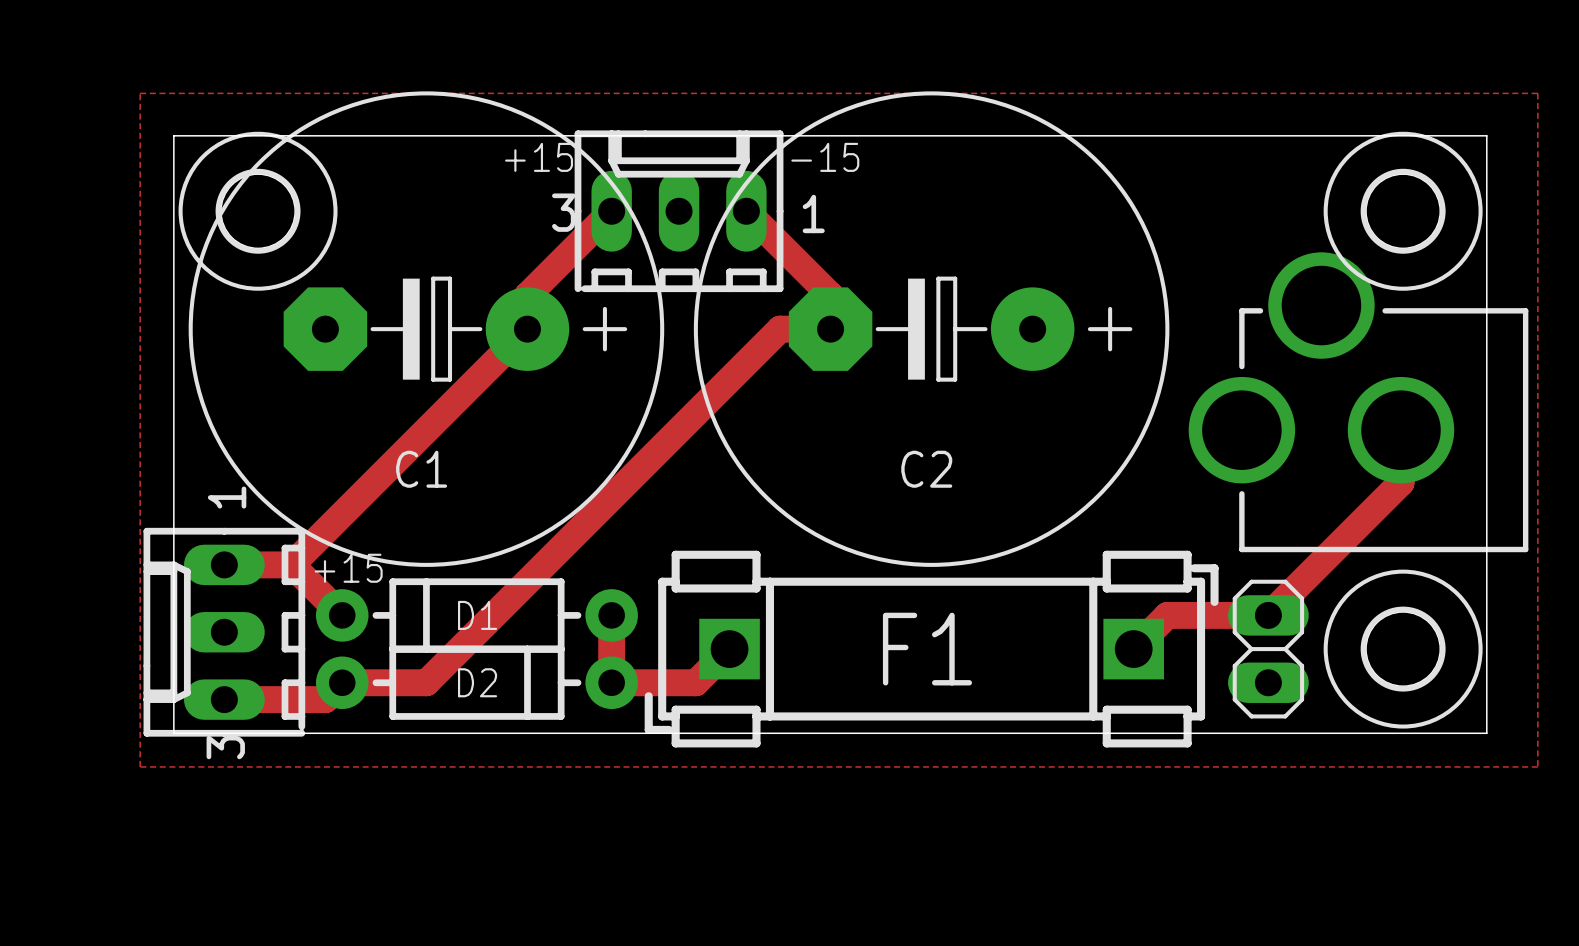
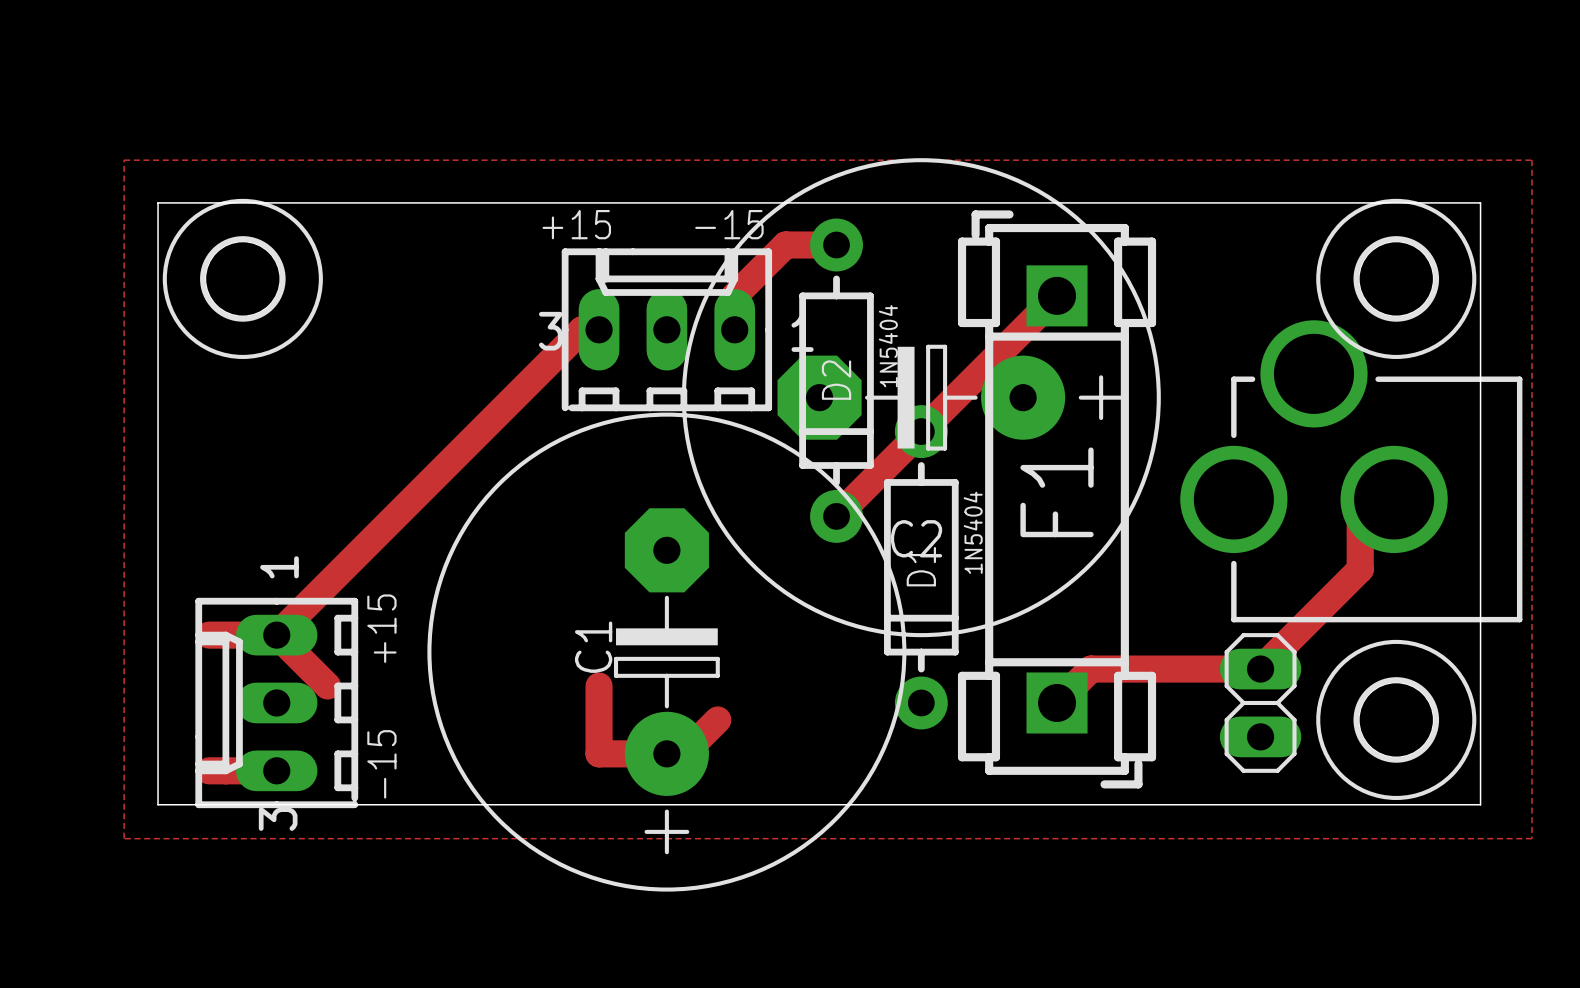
text position: +15 (539, 157) -> +15 (576, 224)
text position: -15 (825, 157) -> -15 (729, 224)
track: none -> (836, 244) (785, 244) (734, 295) (734, 329)
track: (611, 211) (527, 295) (527, 329) -> (599, 329) (582, 329) (514, 397)
part position: (679, 211) -> (666, 329)
track: (746, 211) (830, 295) (830, 329) (780, 329) (426, 682) (342, 682) (325, 699) (291, 699) -> none
track: none -> (1057, 295) (836, 516)
D2 value: none -> 1N5404 (888, 346)
C1 rotation: 0° (426, 329) -> 90° clockwise (666, 652)
C1 position: (426, 329) -> (666, 652)
track: none -> (1360, 499) (1360, 569) (1260, 669) (1090, 669) (1057, 702)
track: (1401, 430) (1401, 482) (1268, 615) (1167, 615) (1133, 649) -> none
D1 value: none -> 1N5404 (973, 532)
C1 name position: C1 (421, 469) -> C1 (593, 647)
text rotation: 0° (348, 568) -> 90° counterclockwise (381, 628)
D1 rotation: 0° (476, 615) -> 90° counterclockwise (921, 567)
D1 position: (476, 615) -> (921, 567)
part position: (224, 632) -> (276, 702)
F1 rotation: 0° (931, 649) -> 90° clockwise (1057, 499)
part position: (1268, 649) -> (1260, 702)
D2 rotation: 0° (476, 682) -> 90° clockwise (836, 380)
D2 position: (476, 682) -> (836, 380)
text: none -> -15 (381, 764)

